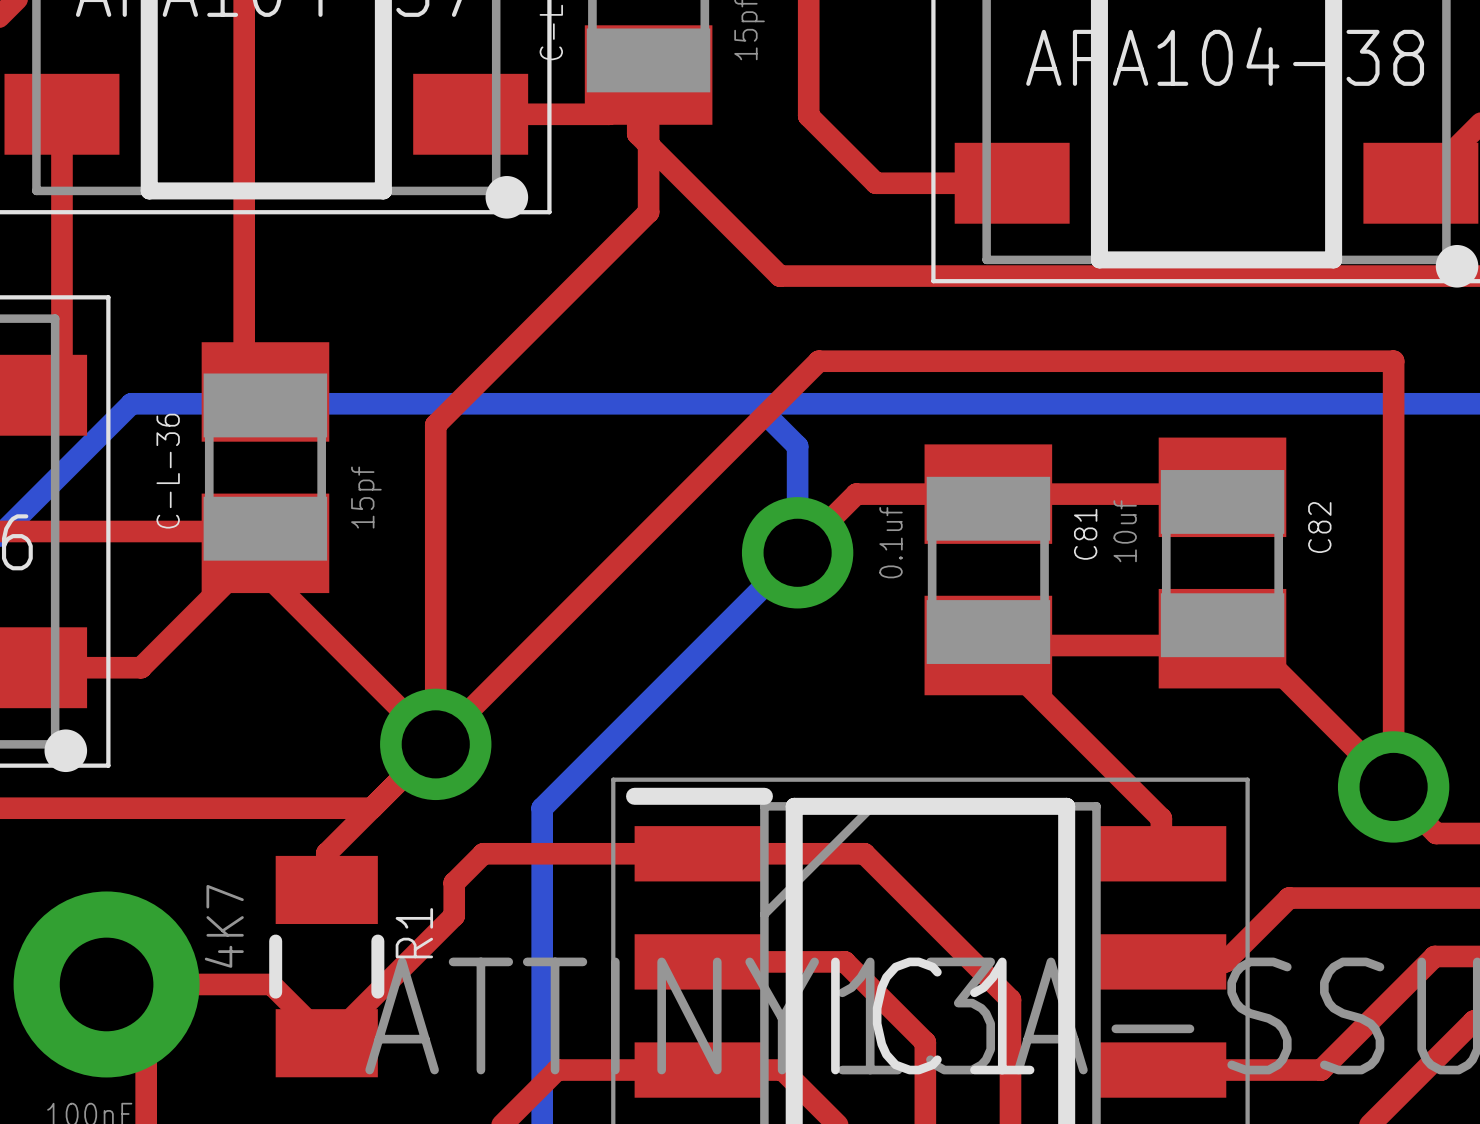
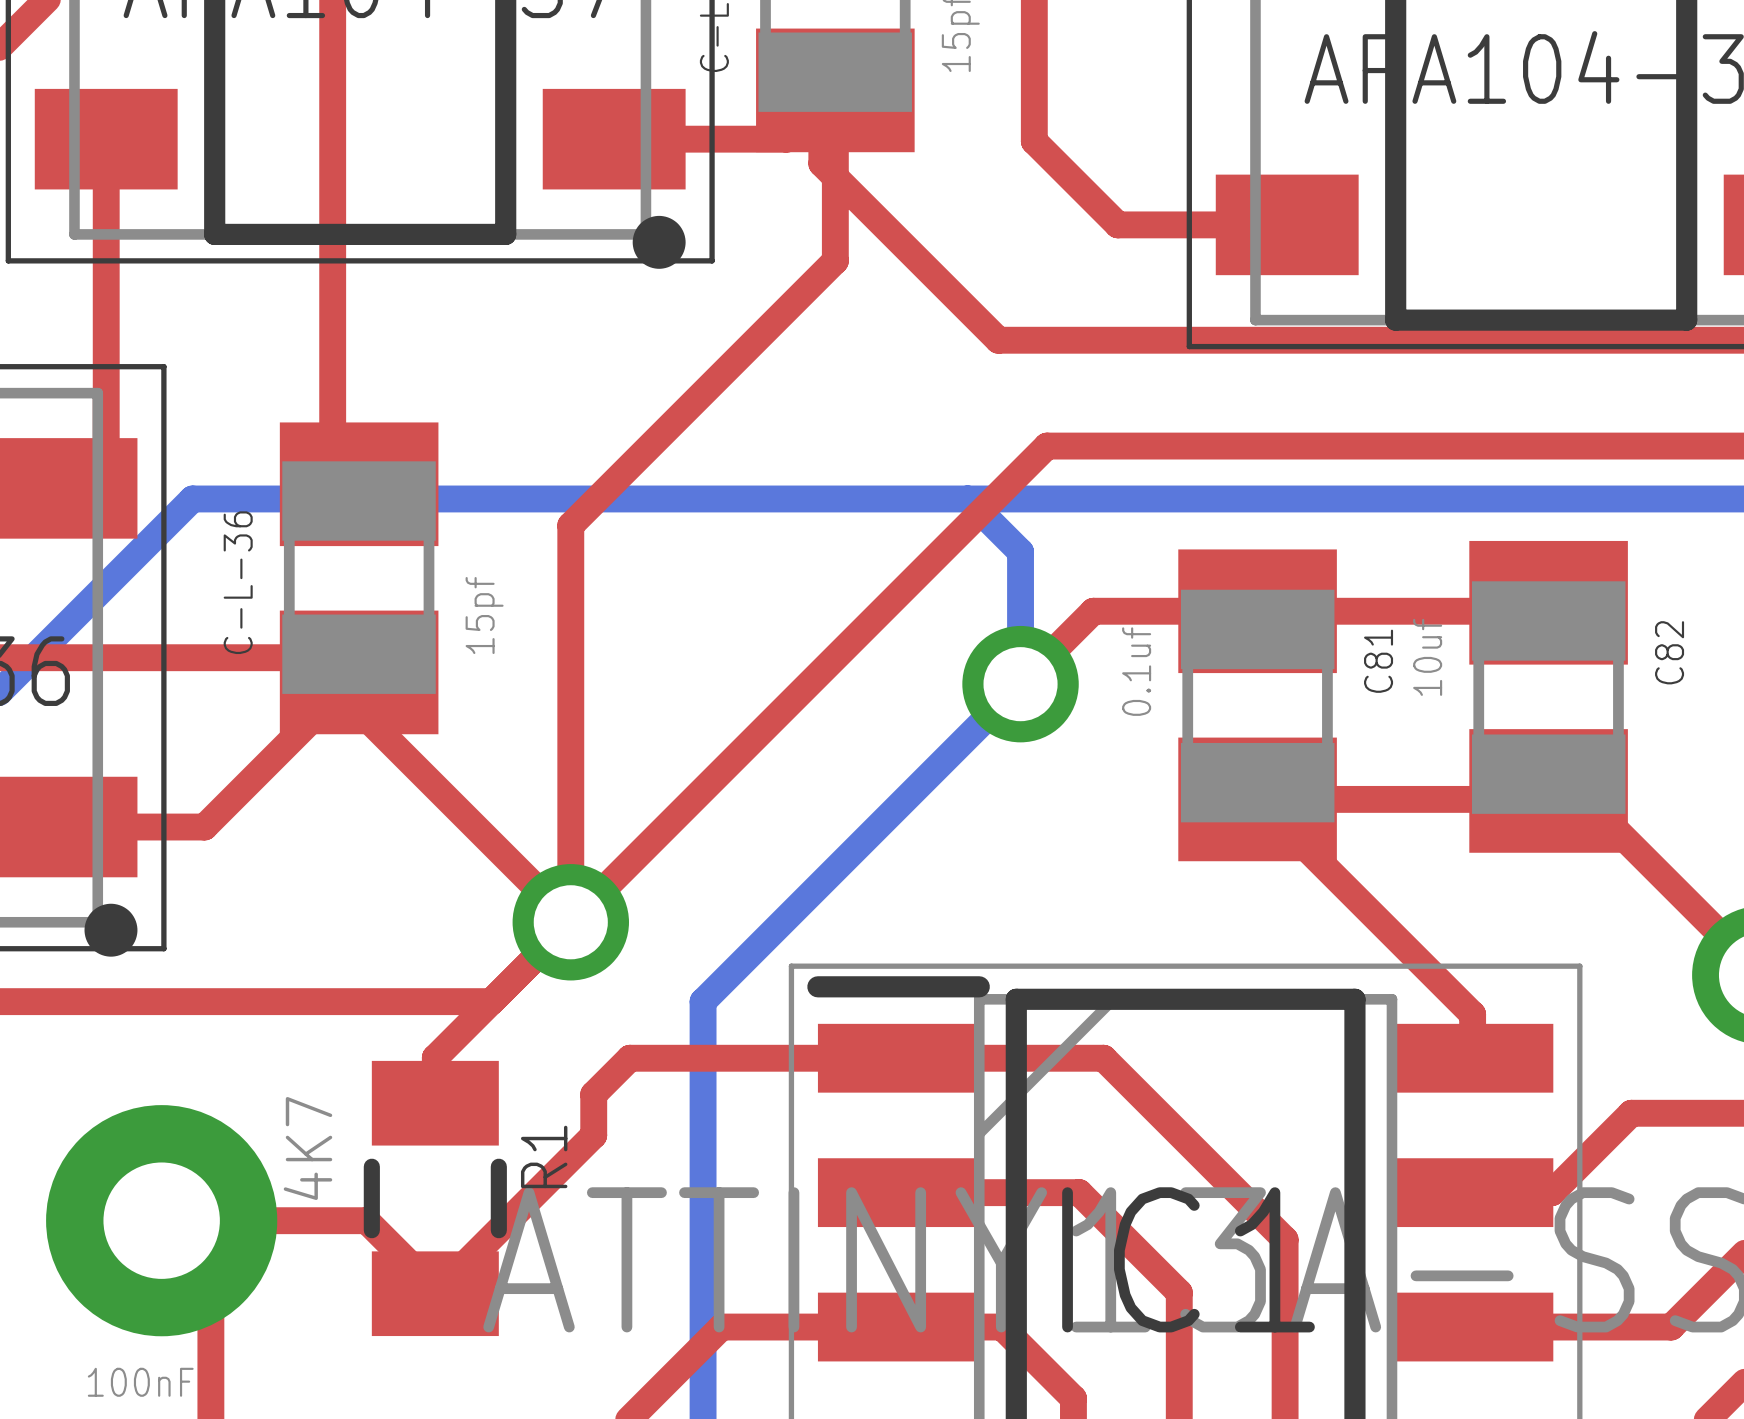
via size: [741, 497, 854, 609] -> [962, 625, 1079, 743]
via size: [380, 688, 492, 801] -> [512, 864, 629, 981]

